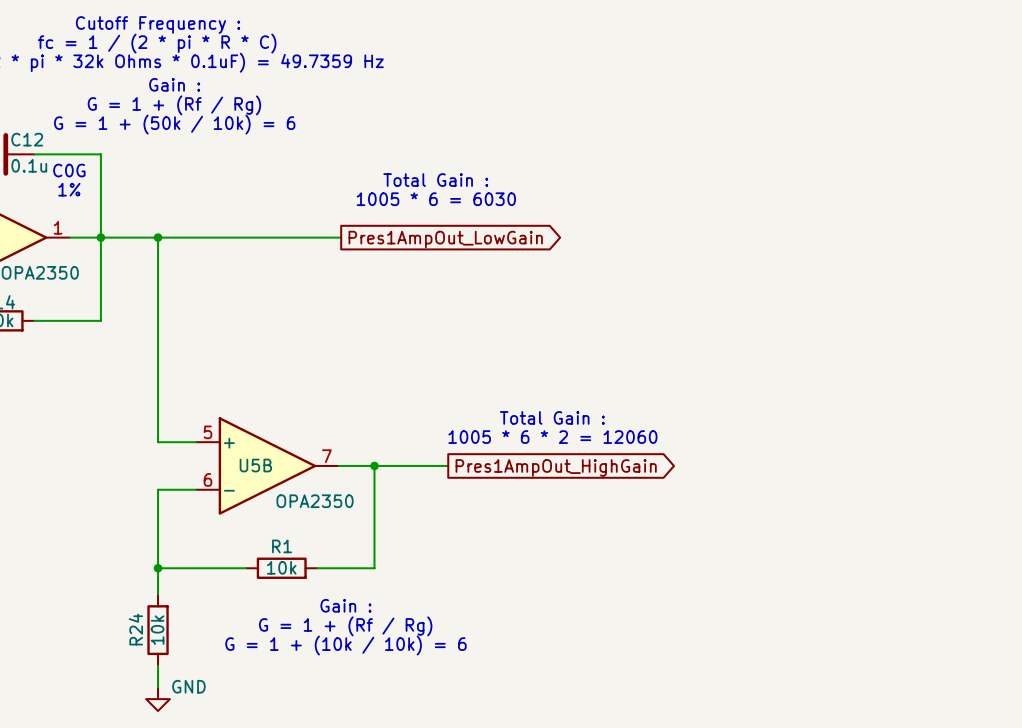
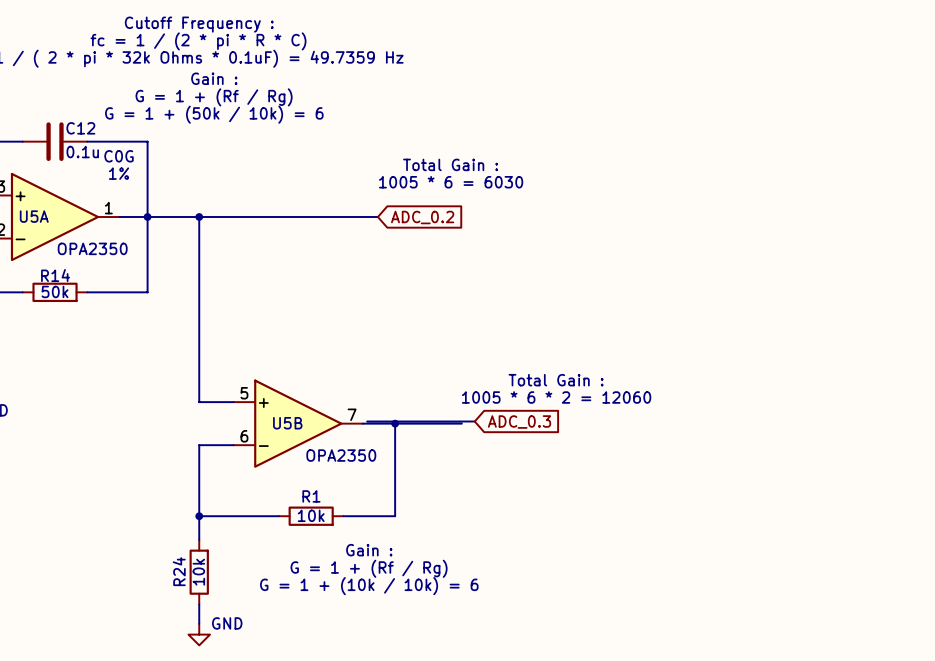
global label: none -> ADC_0.2 (422, 217)
global label: Pres1AmpOut_LowGain (445, 239) -> none
wire: none -> (367, 421) (474, 421)
global label: none -> ADC_0.3 (519, 422)
global label: Pres1AmpOut_HighGain (556, 467) -> none

